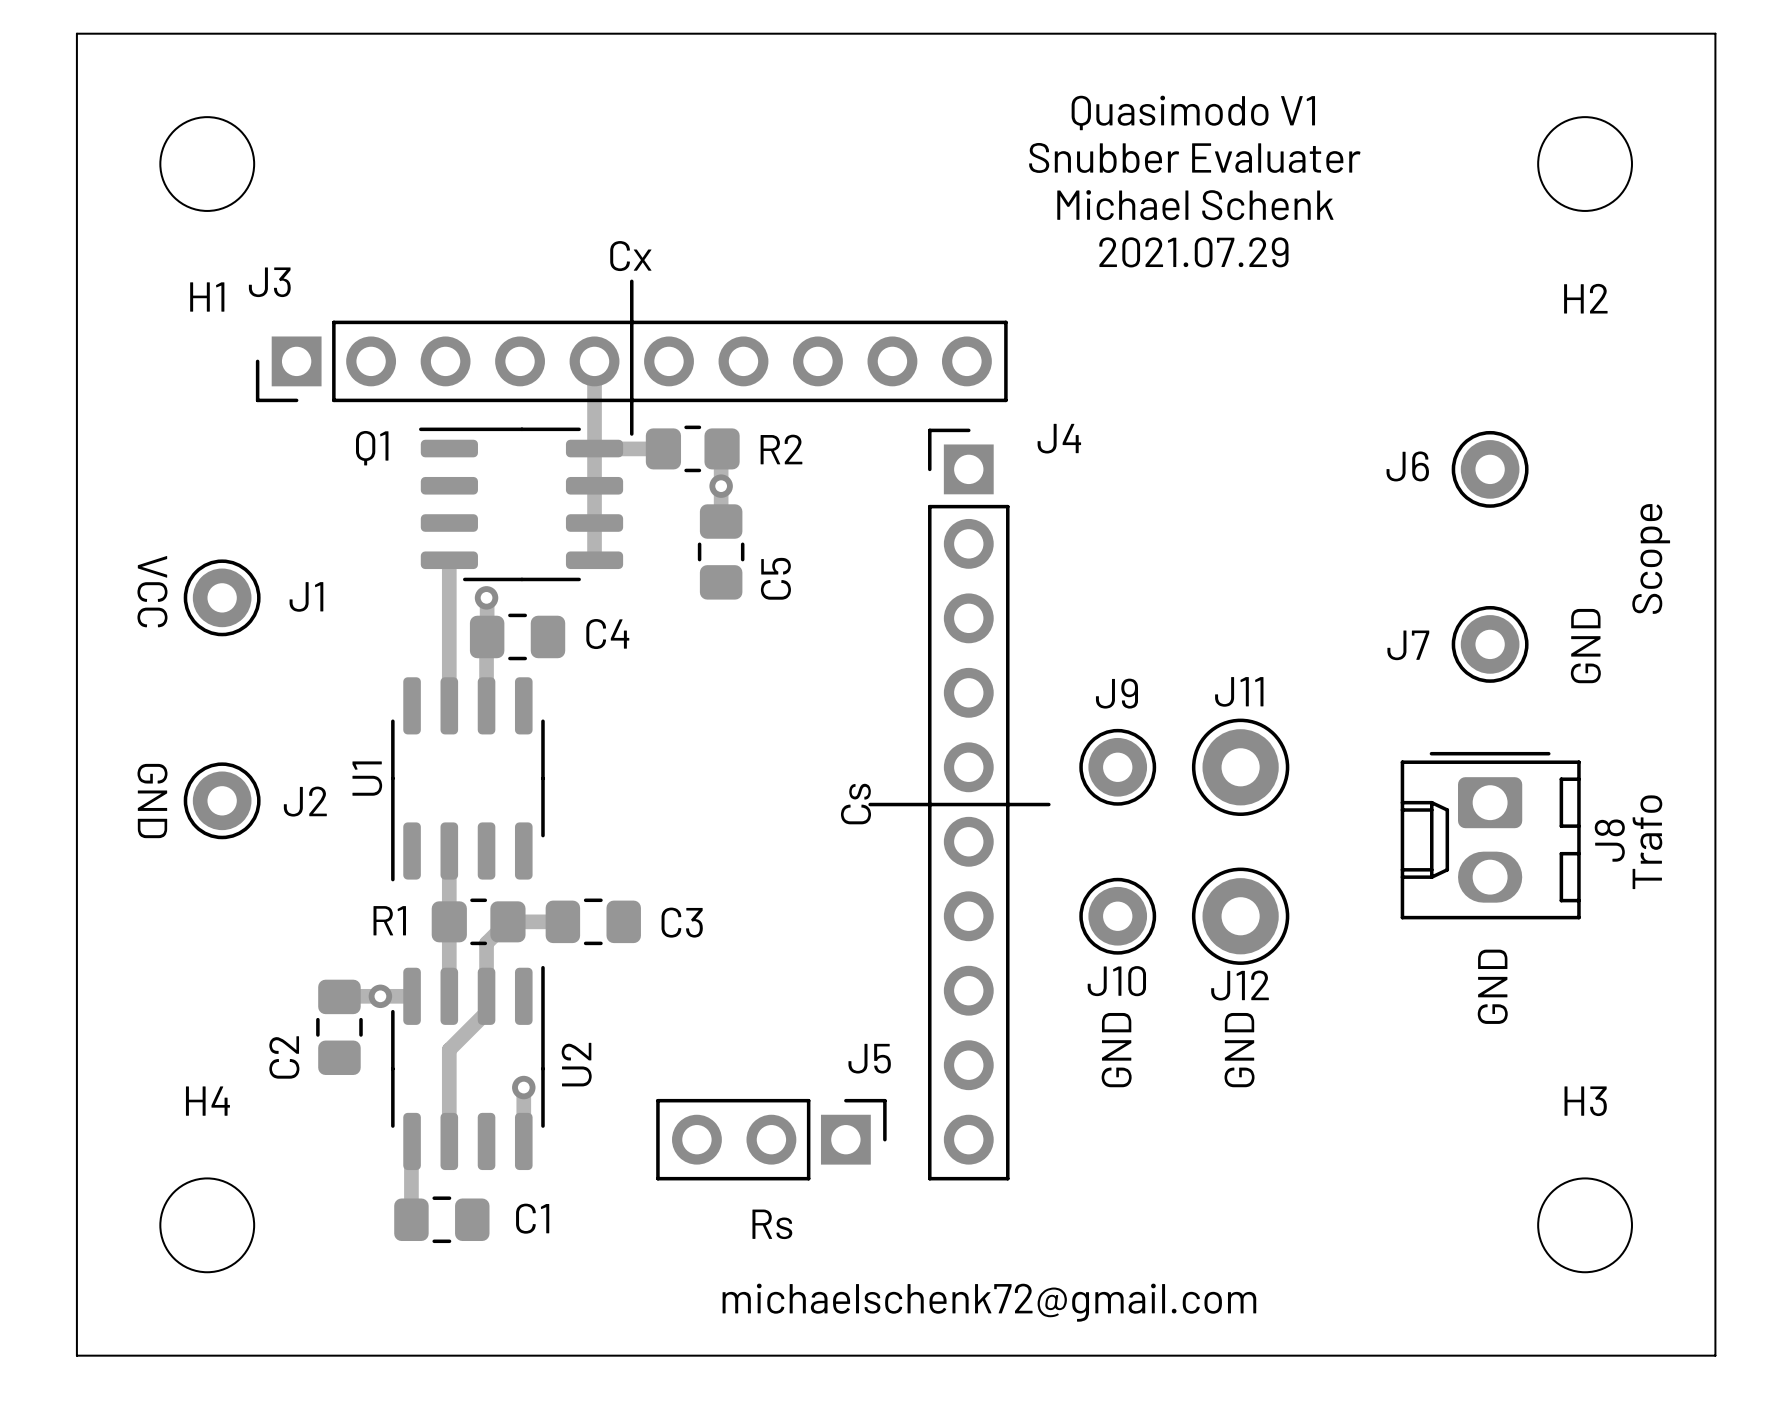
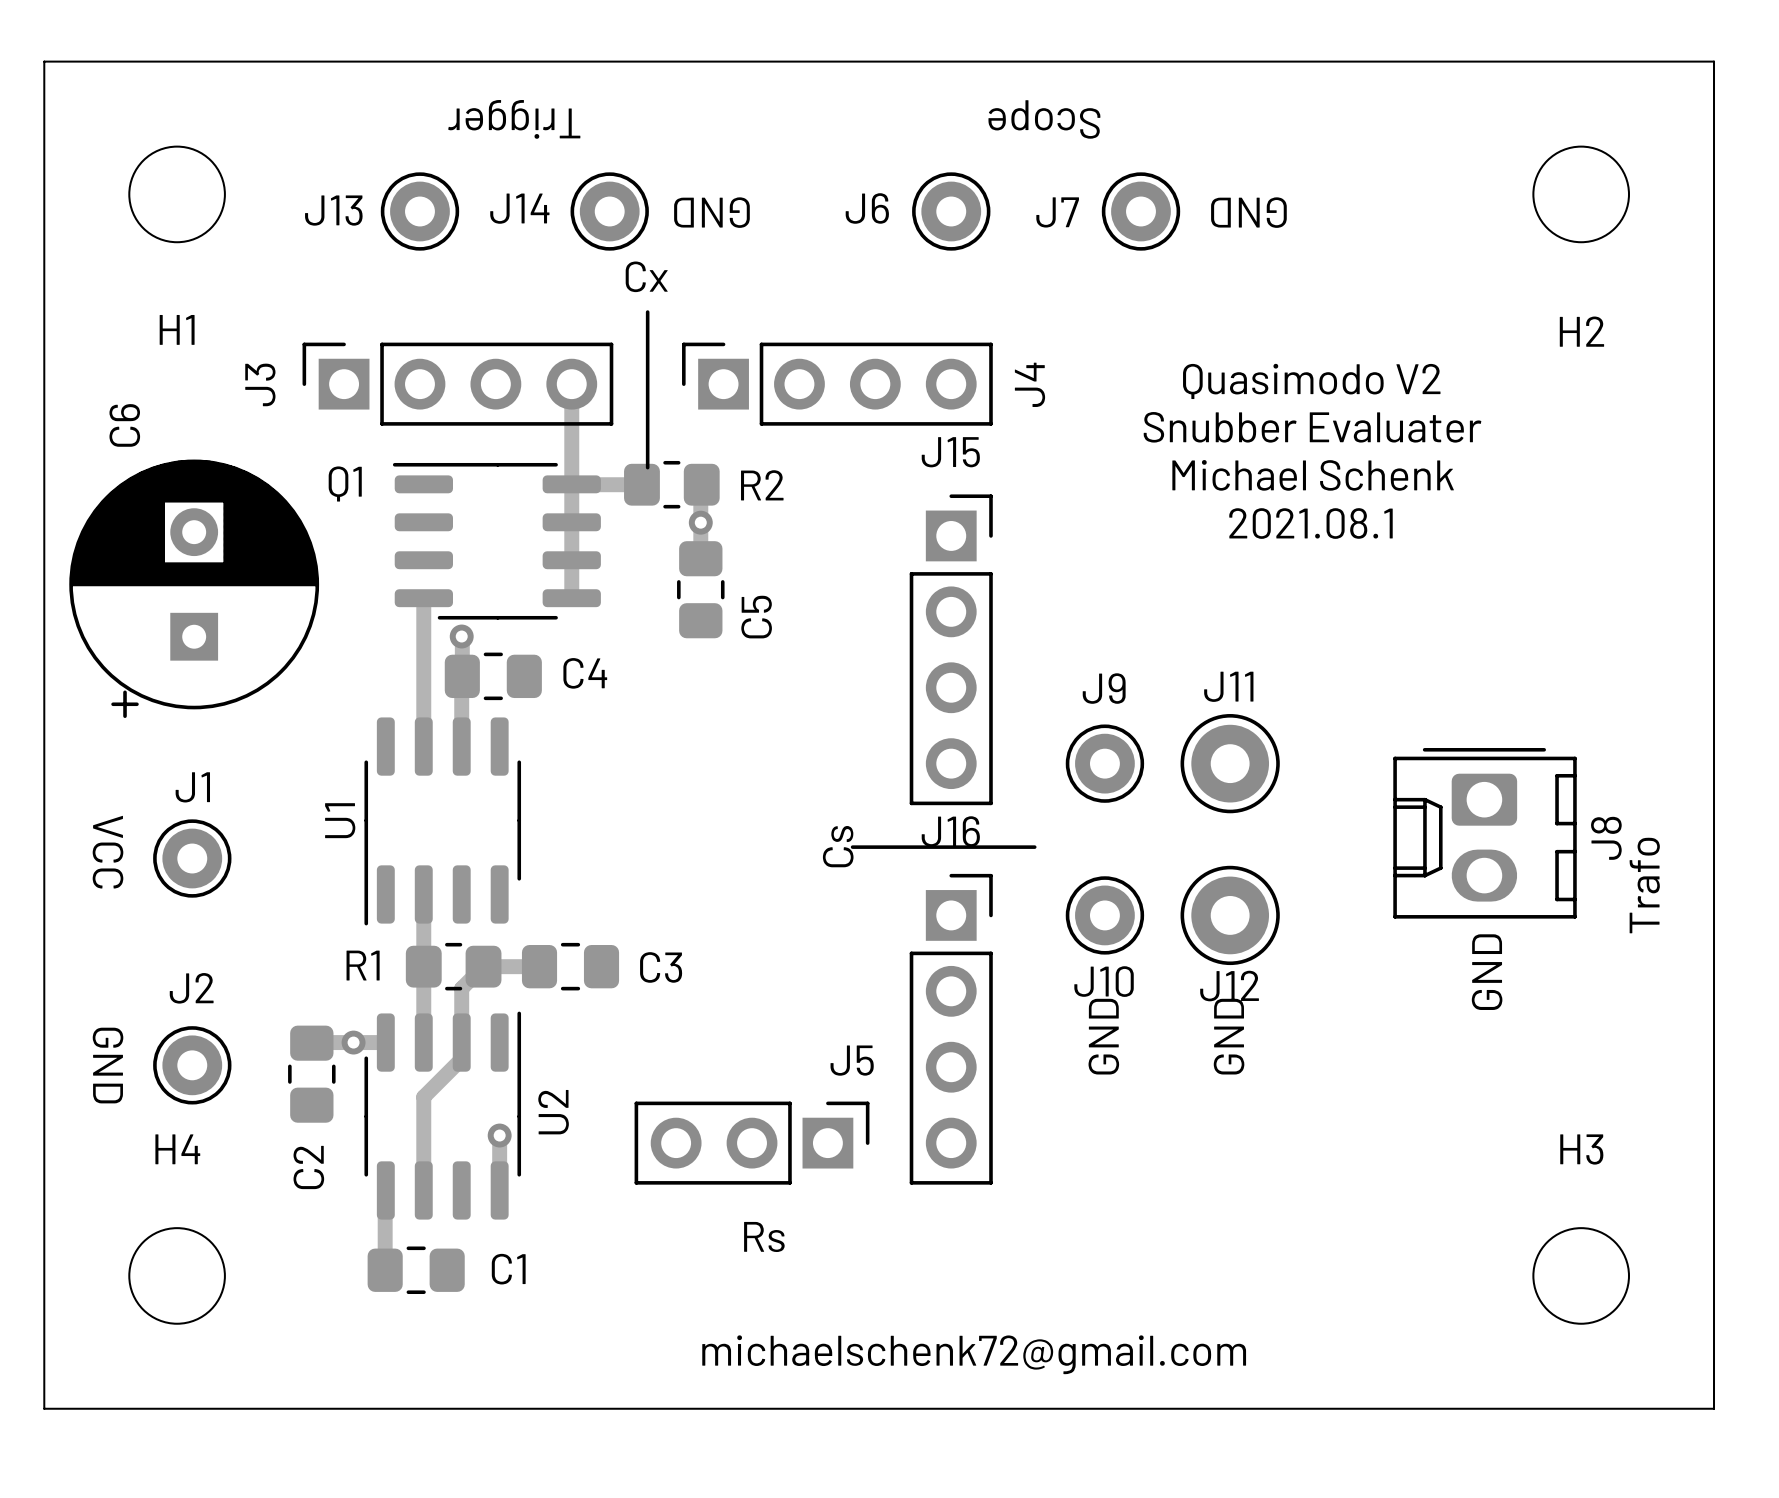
text: none -> Trigger (514, 119)
text: none -> Scope (1044, 119)
text: Quasimodo V1 (1193, 112) -> none
text position: Snubber Evaluater (1194, 157) -> Snubber Evaluater (1312, 427)
J13: none -> (419, 211)
J14: none -> (609, 211)
text: none -> GND (711, 212)
text: none -> GND (1248, 212)
text position: Michael Schenk (1195, 205) -> Michael Schenk (1313, 475)
text: 2021.07.29 (1193, 252) -> none
text position: Cx (630, 256) -> Cx (646, 276)
line: (631, 281) (631, 434) -> (647, 312) (647, 467)
J3 name position: J3 (269, 282) -> J3 (260, 384)
J3 footprint: [255, 320, 1008, 403] -> [302, 342, 614, 426]
text: none -> Quasimodo V2 (1311, 381)
J4 footprint: [928, 428, 1010, 1181] -> [682, 342, 993, 426]
J4 name position: J4 (1059, 438) -> J4 (1029, 384)
J6 position: (1490, 469) -> (951, 211)
text: none -> 2021.08.1 (1310, 523)
C6: none -> (194, 588)
text: Scope (1651, 558) -> none
text position: VCC (152, 591) -> VCC (107, 852)
J1 name position: J1 (306, 596) -> J1 (192, 787)
J1 position: (222, 597) -> (192, 858)
J15: none -> (951, 649)
J7 position: (1490, 644) -> (1140, 211)
text: GND (1585, 646) -> none
J9 position: (1117, 767) -> (1104, 763)
J11 position: (1240, 767) -> (1230, 763)
J2 position: (222, 800) -> (192, 1065)
text position: GND (152, 801) -> GND (108, 1065)
J2 name position: J2 (305, 801) -> J2 (191, 988)
J8 position: (1490, 835) -> (1485, 833)
J10 position: (1117, 916) -> (1104, 915)
J12 position: (1240, 916) -> (1230, 915)
J16: none -> (951, 1029)
text position: GND (1492, 986) -> GND (1487, 972)
text position: GND (1116, 1050) -> GND (1103, 1036)
text position: GND (1239, 1050) -> GND (1229, 1036)
C2 name position: C2 (284, 1057) -> C2 (308, 1167)
J5 position: (771, 1139) -> (752, 1143)
text position: Rs (772, 1224) -> Rs (764, 1236)

